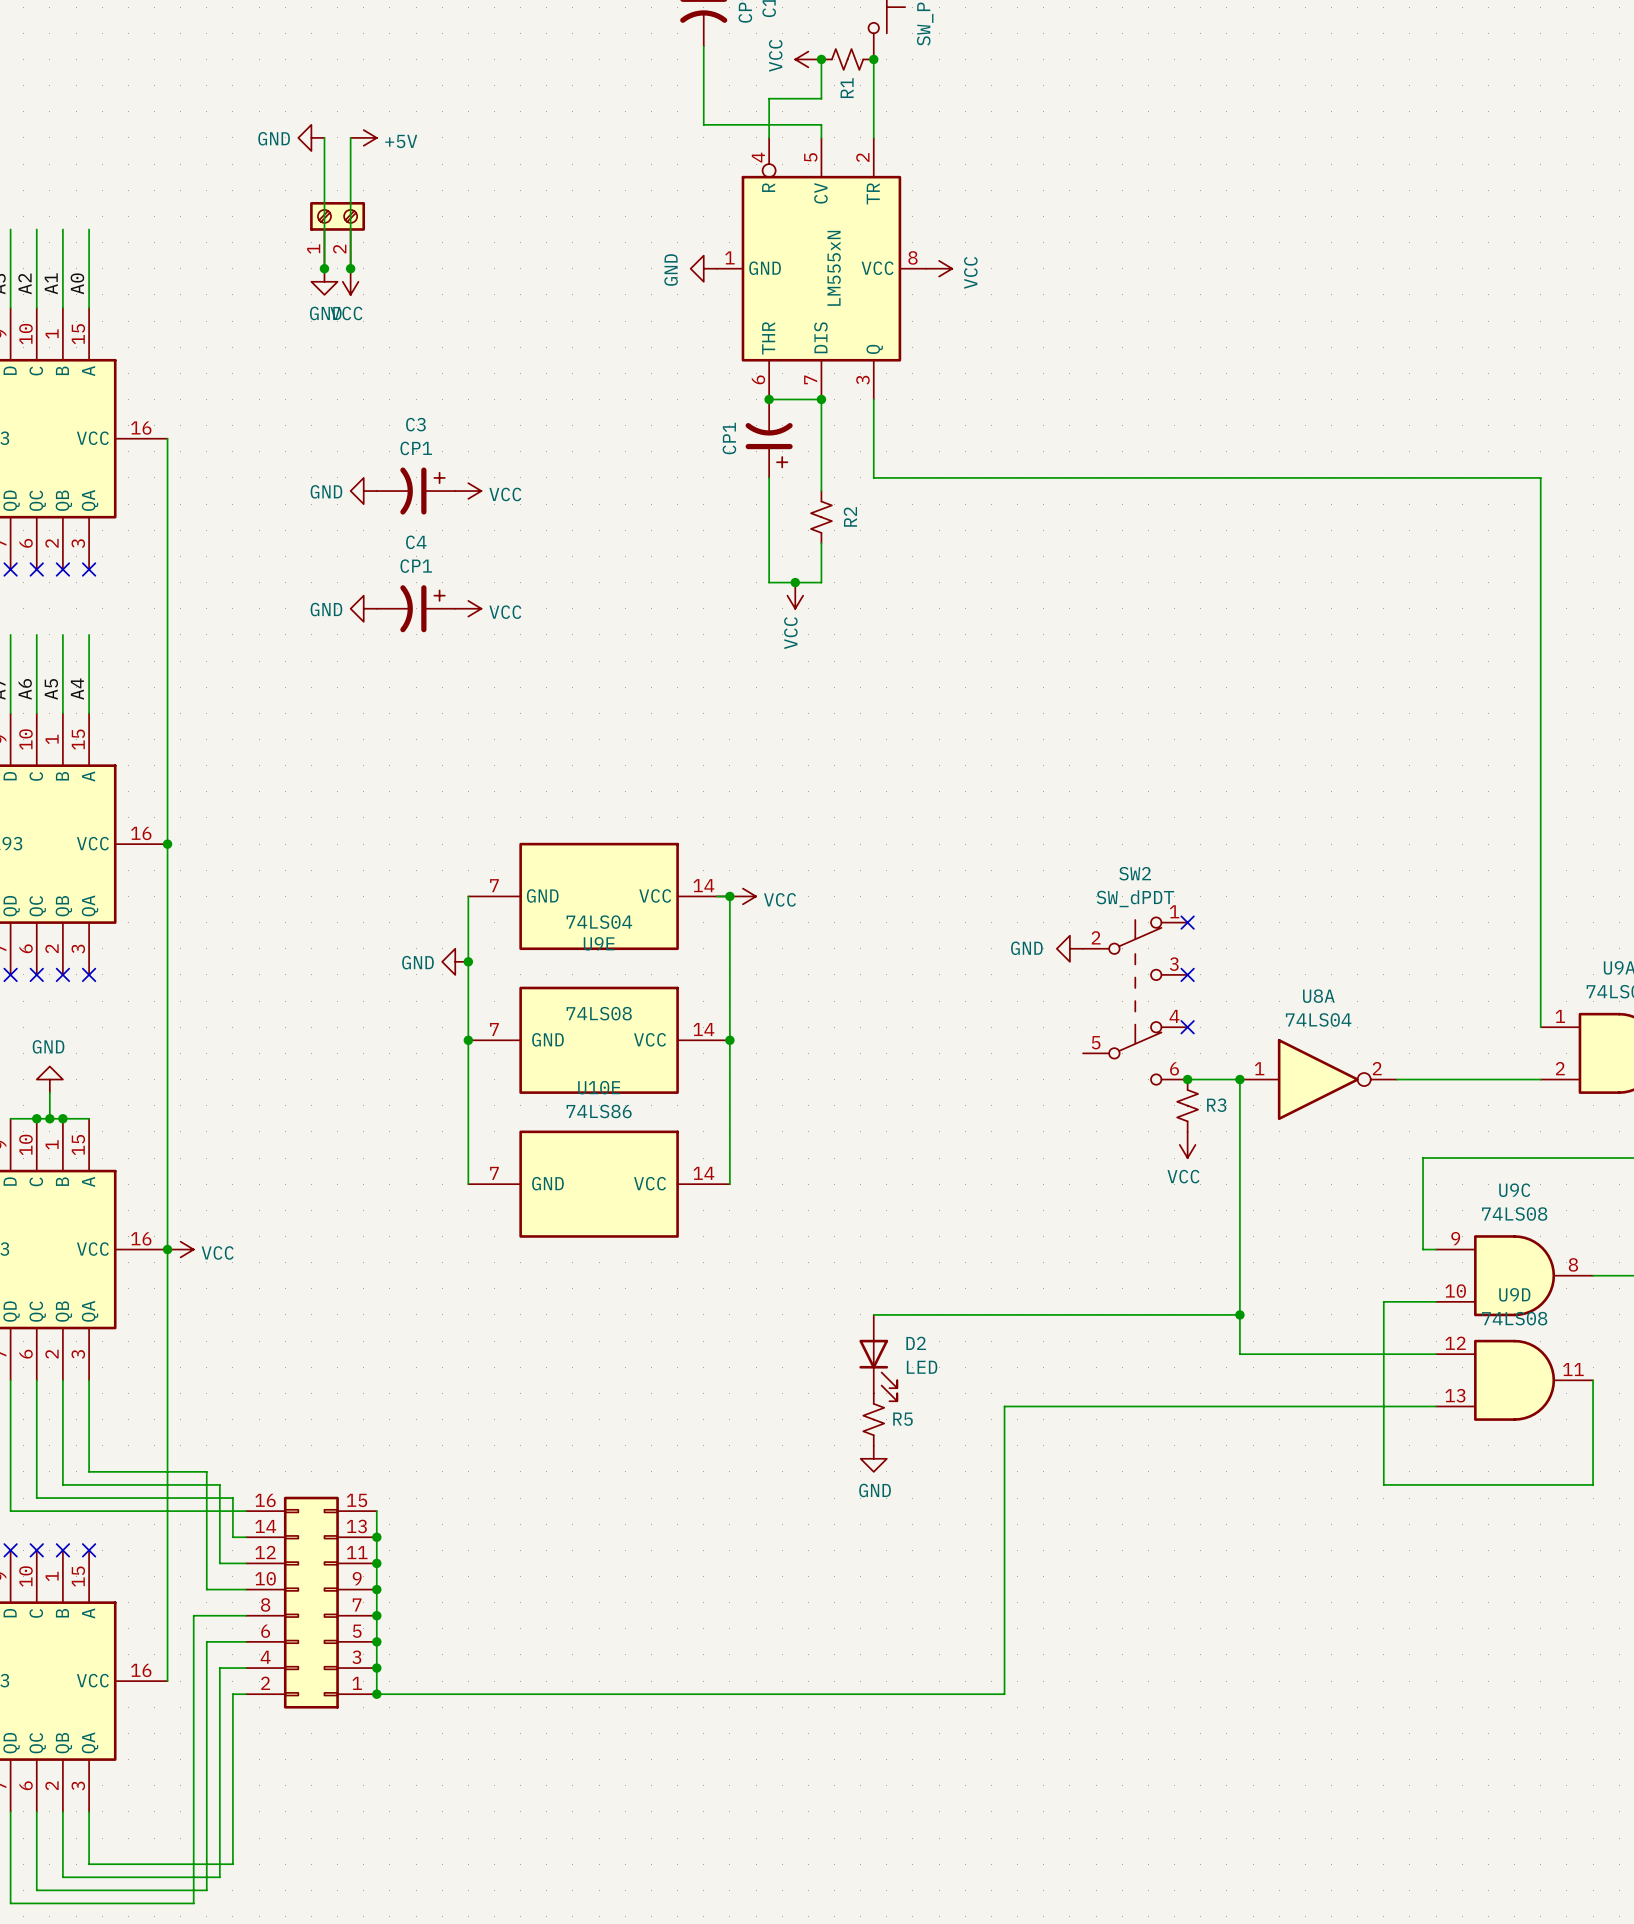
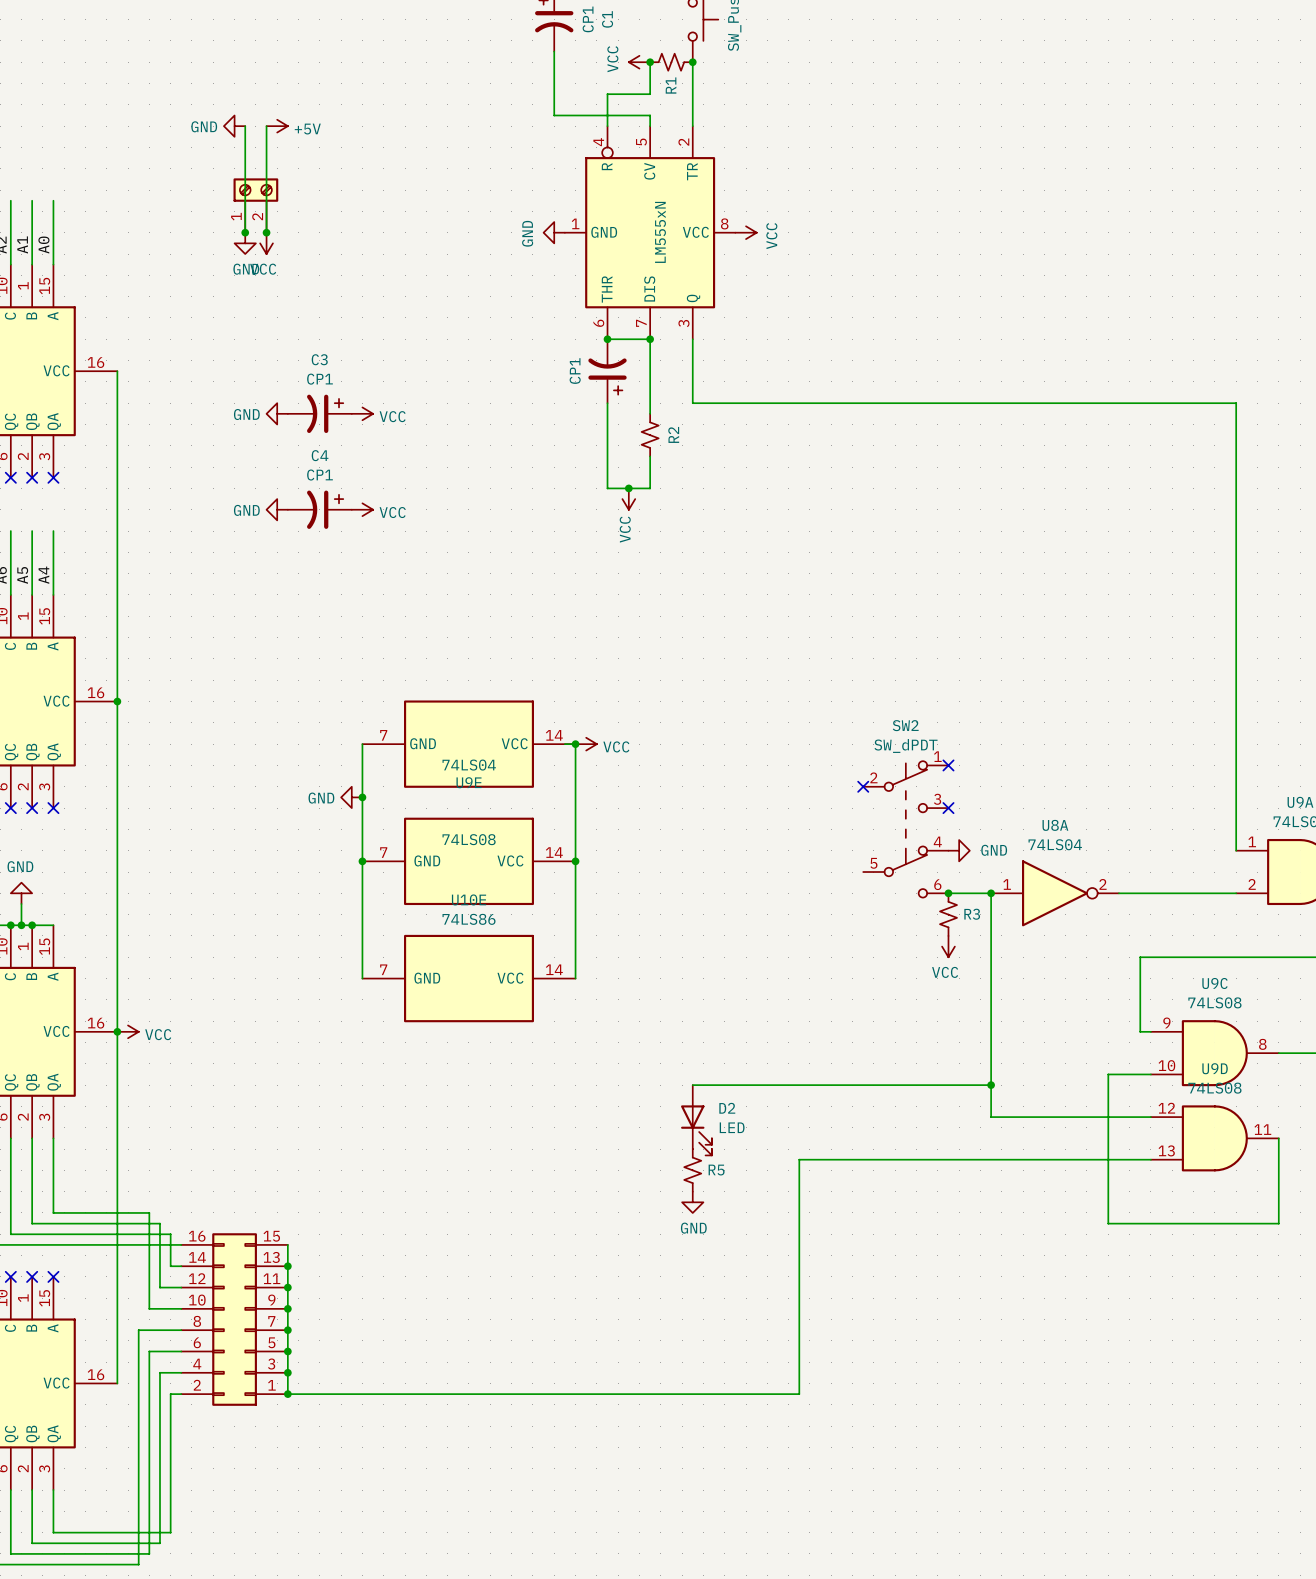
power symbol rotation: 0° (1069, 948) -> 180° (959, 850)
power symbol position: GND (1069, 948) -> GND (959, 850)
no-connect mark: none -> (863, 786)
no-connect mark: (1187, 1027) -> none

